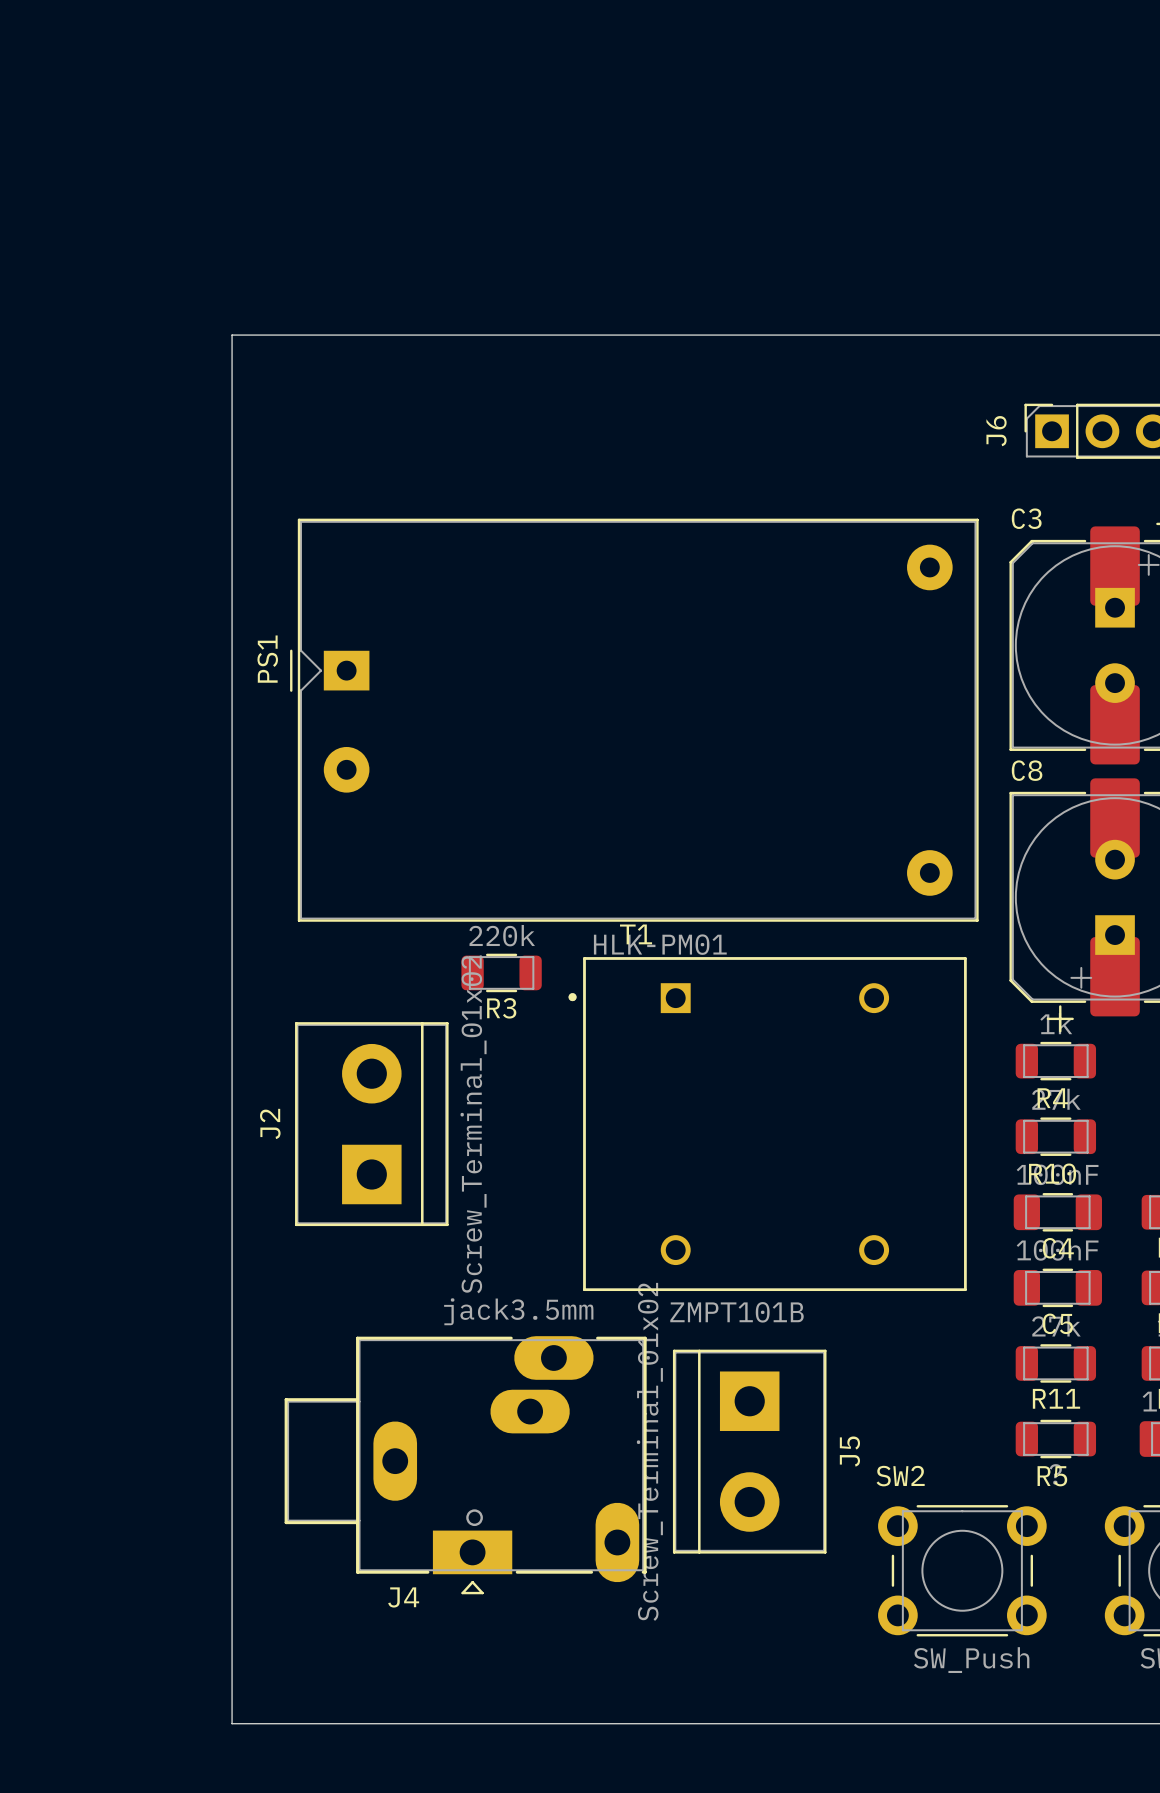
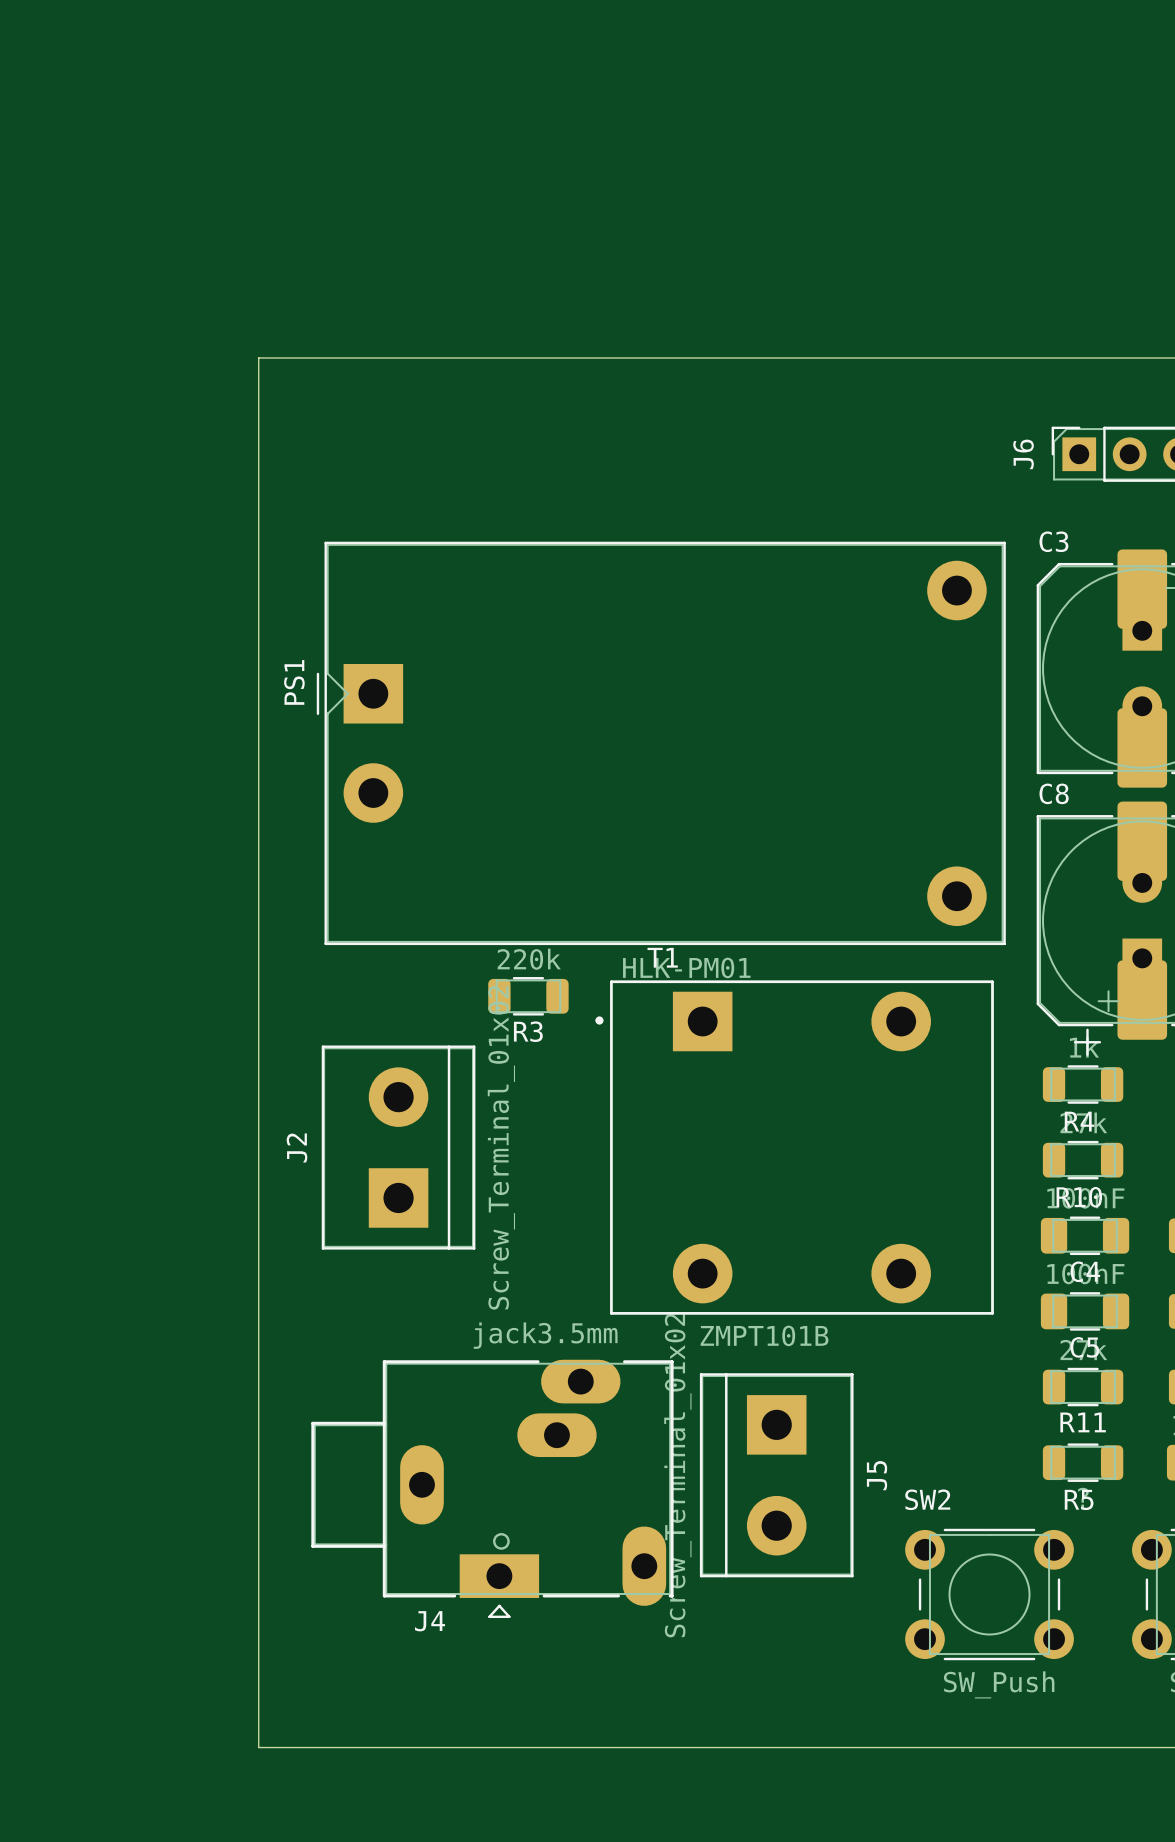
PS1 footprint: [290, 518, 979, 922] -> [316, 541, 1006, 946]
T1 footprint: [568, 957, 967, 1292] -> [595, 980, 994, 1315]

